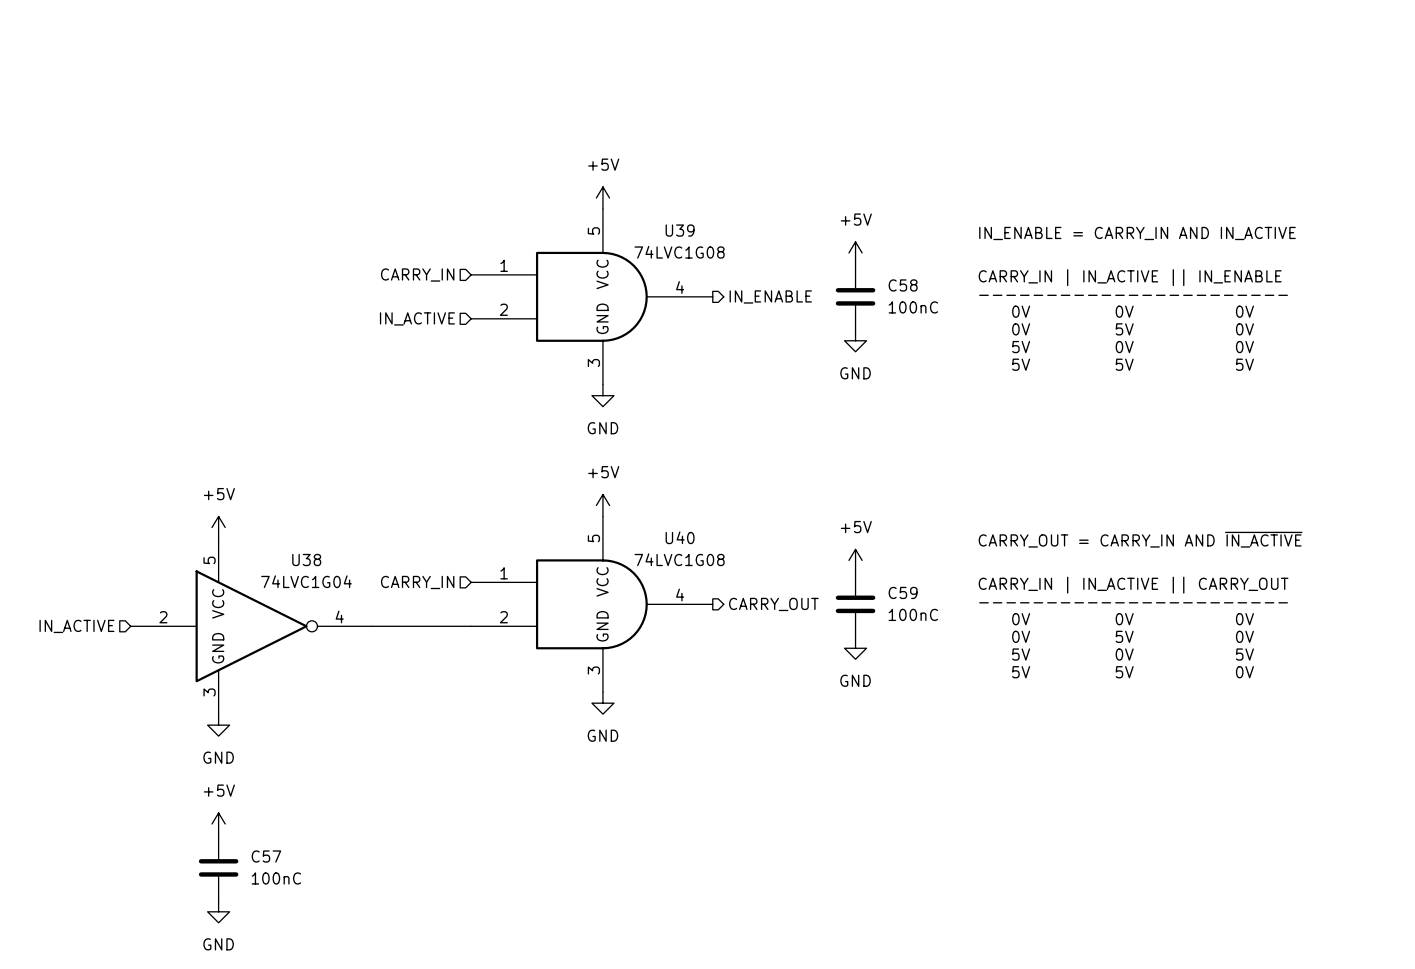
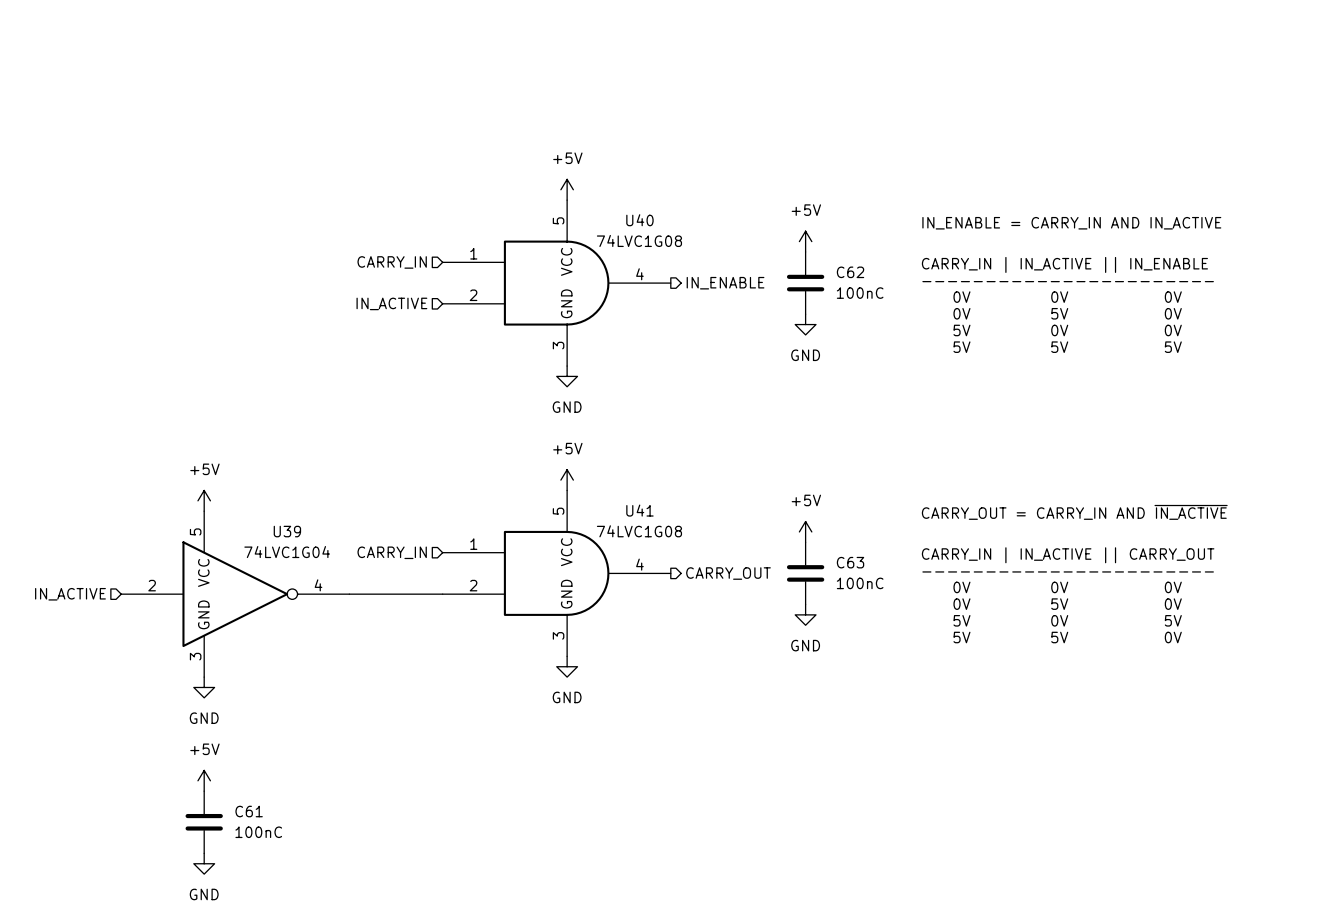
U39 name: U39 (680, 230) -> U40 (639, 220)
C58 name: C58 (903, 285) -> C62 (850, 272)
U40 name: U40 (680, 537) -> U41 (639, 510)
U38 name: U38 (306, 560) -> U39 (287, 531)
C59 name: C59 (903, 592) -> C63 (850, 562)
C57 name: C57 (266, 856) -> C61 (249, 811)

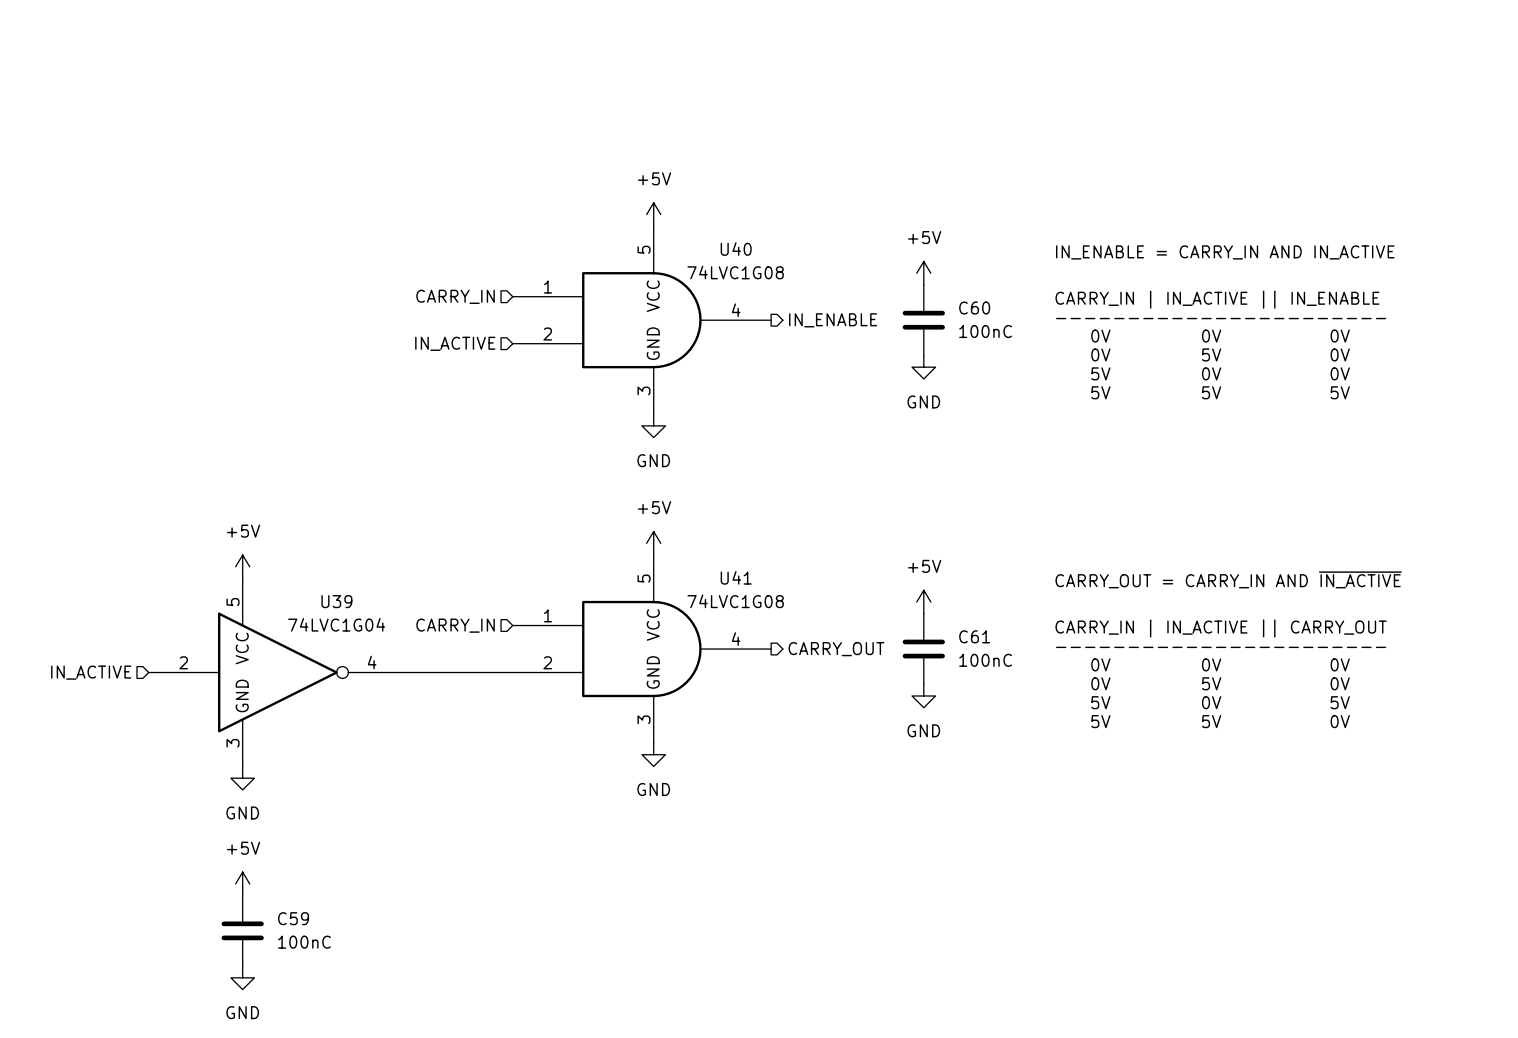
C62 name: C62 (850, 272) -> C60 (974, 308)
C63 name: C63 (850, 562) -> C61 (974, 636)
C61 name: C61 (249, 811) -> C59 (293, 918)

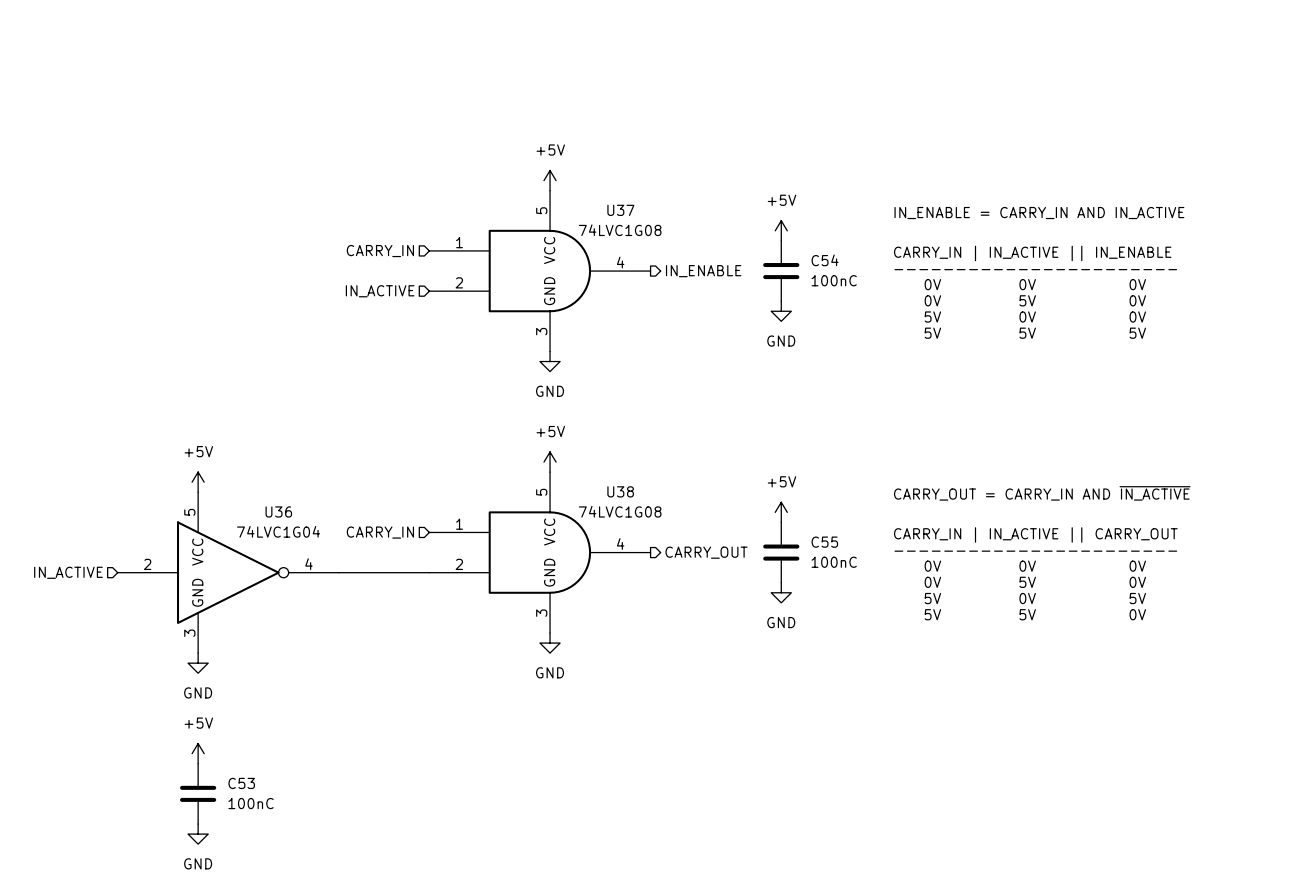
U40 name: U40 (736, 249) -> U37 (620, 210)
C60 name: C60 (974, 308) -> C54 (825, 260)
U41 name: U41 (736, 577) -> U38 (620, 491)
U39 name: U39 (336, 601) -> U36 (278, 511)
C61 name: C61 (974, 636) -> C55 (824, 542)
C59 name: C59 (293, 918) -> C53 (241, 783)

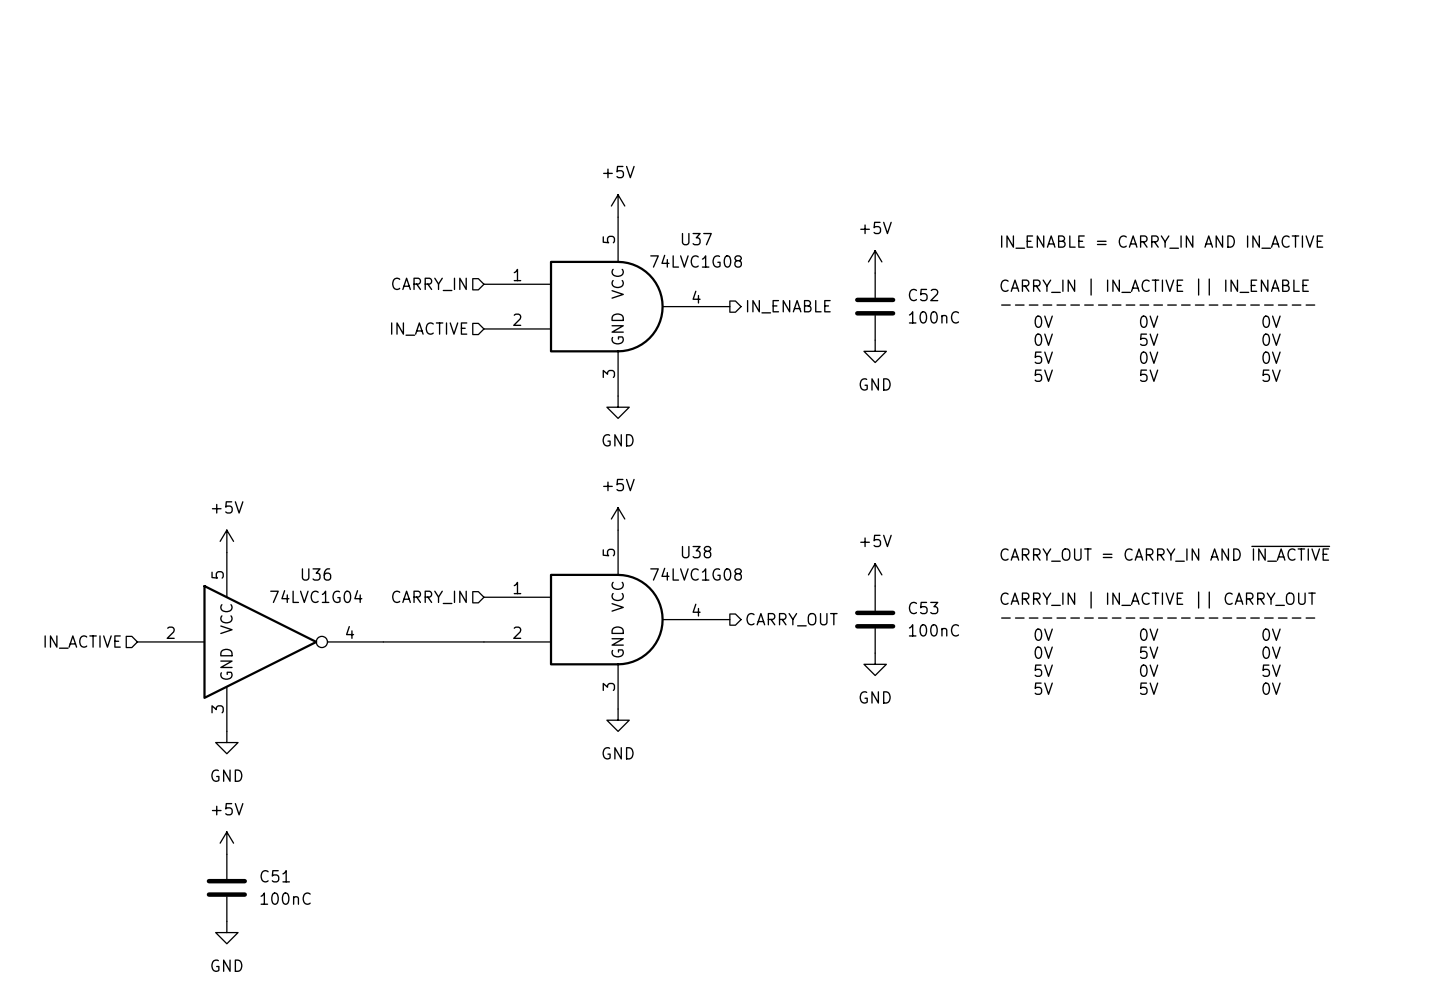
C54 name: C54 (825, 260) -> C52 (923, 295)
C55 name: C55 (824, 542) -> C53 (923, 608)
C53 name: C53 (241, 783) -> C51 (275, 876)

